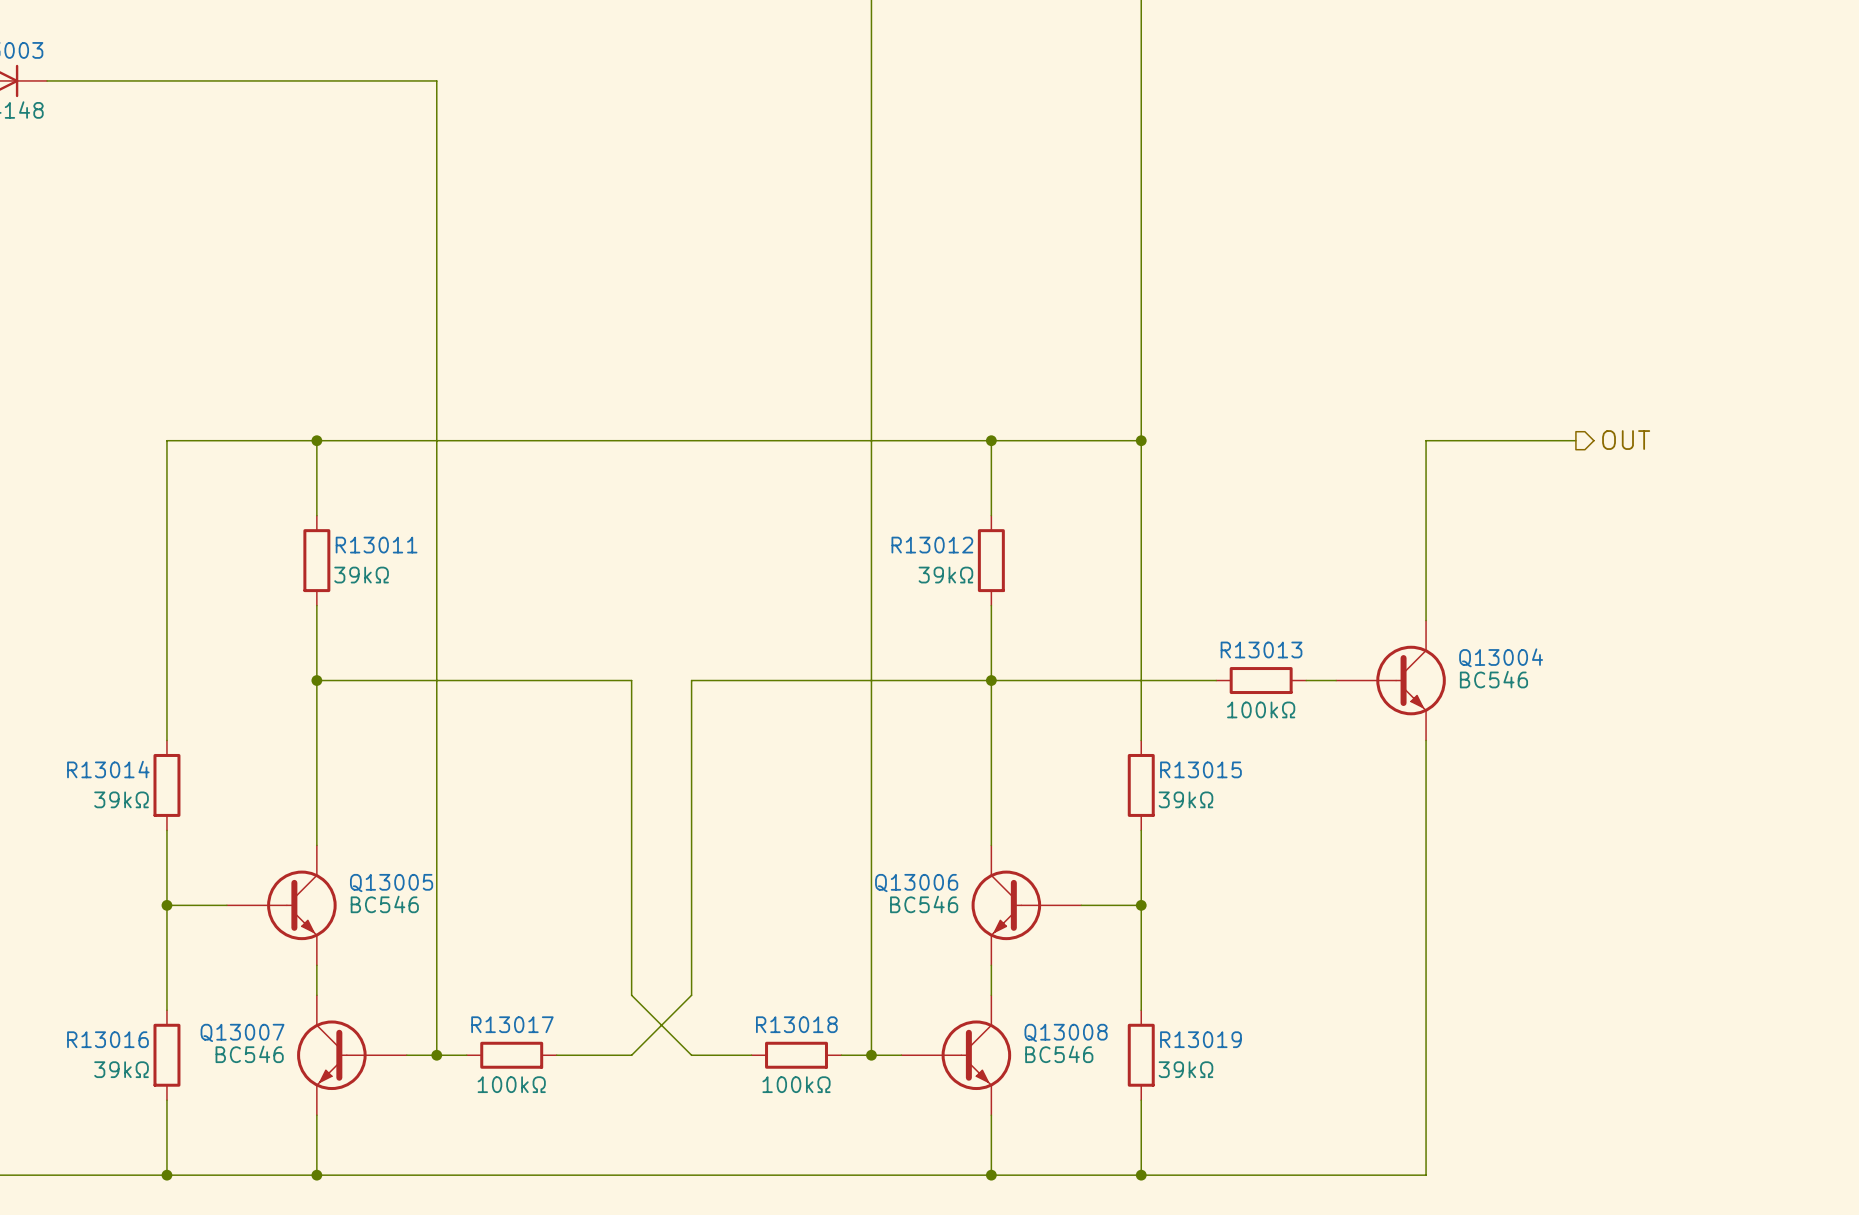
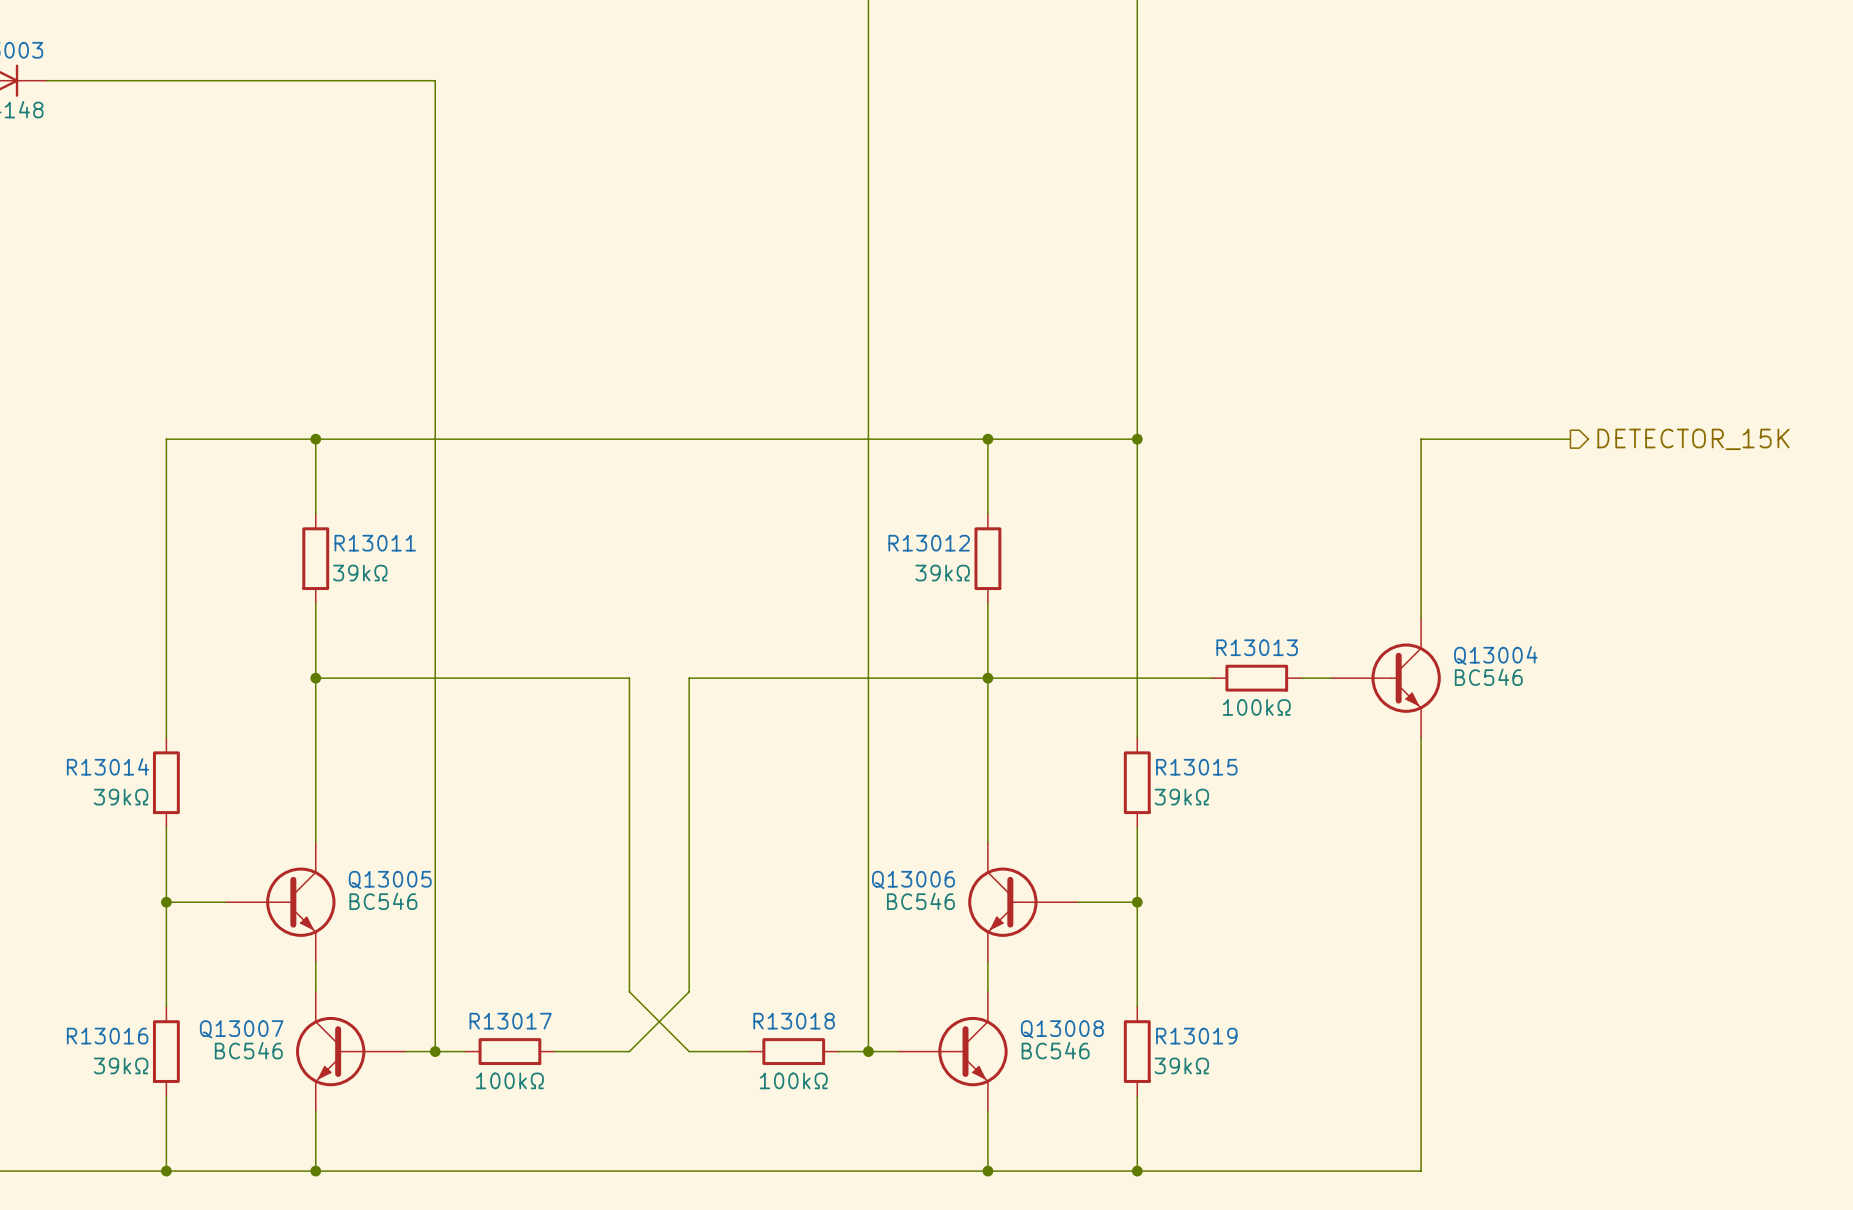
hierarchical label: OUT (1626, 440) -> DETECTOR_15K (1693, 439)

